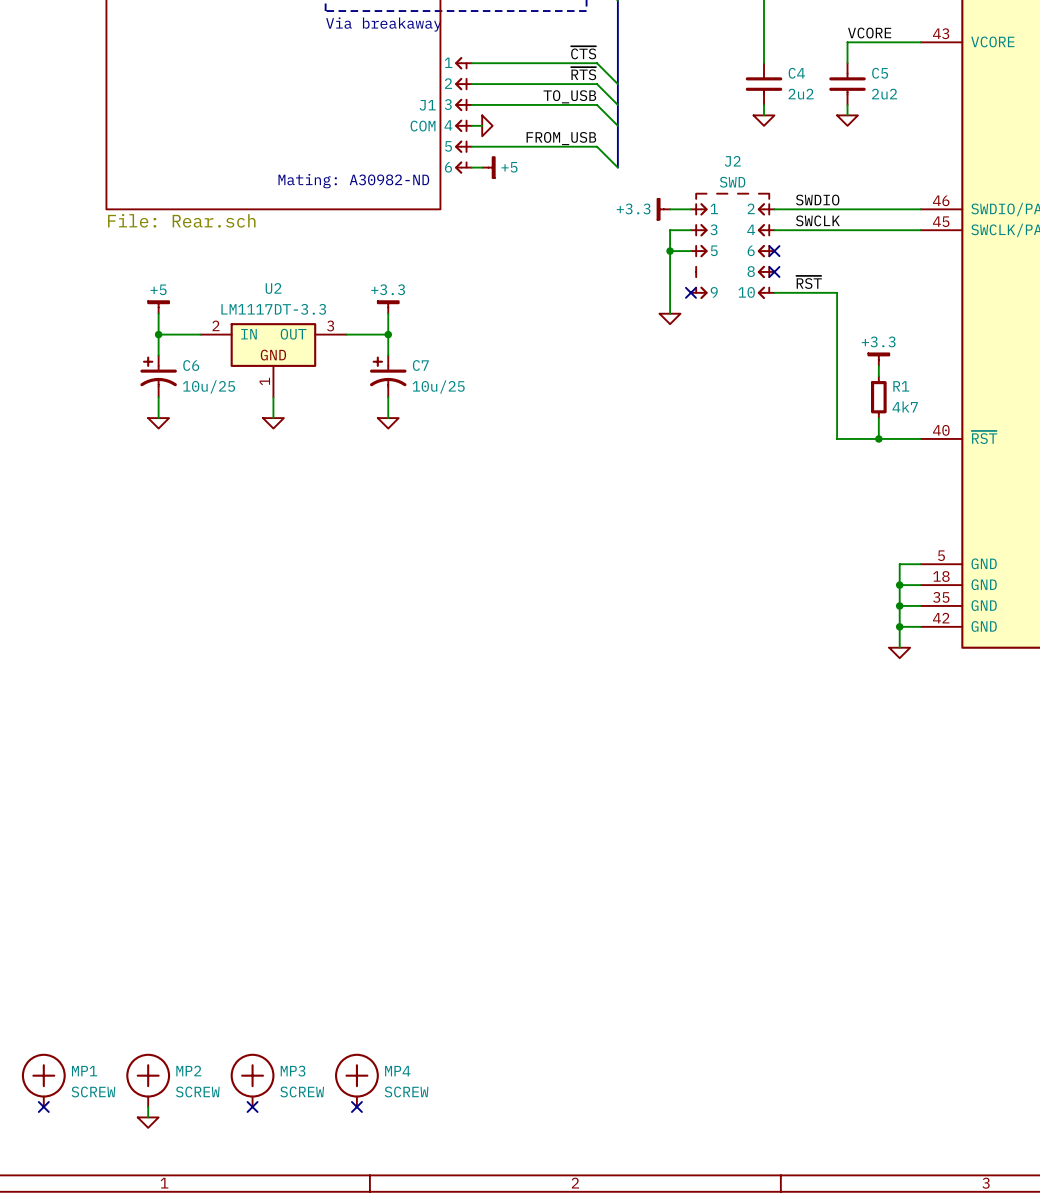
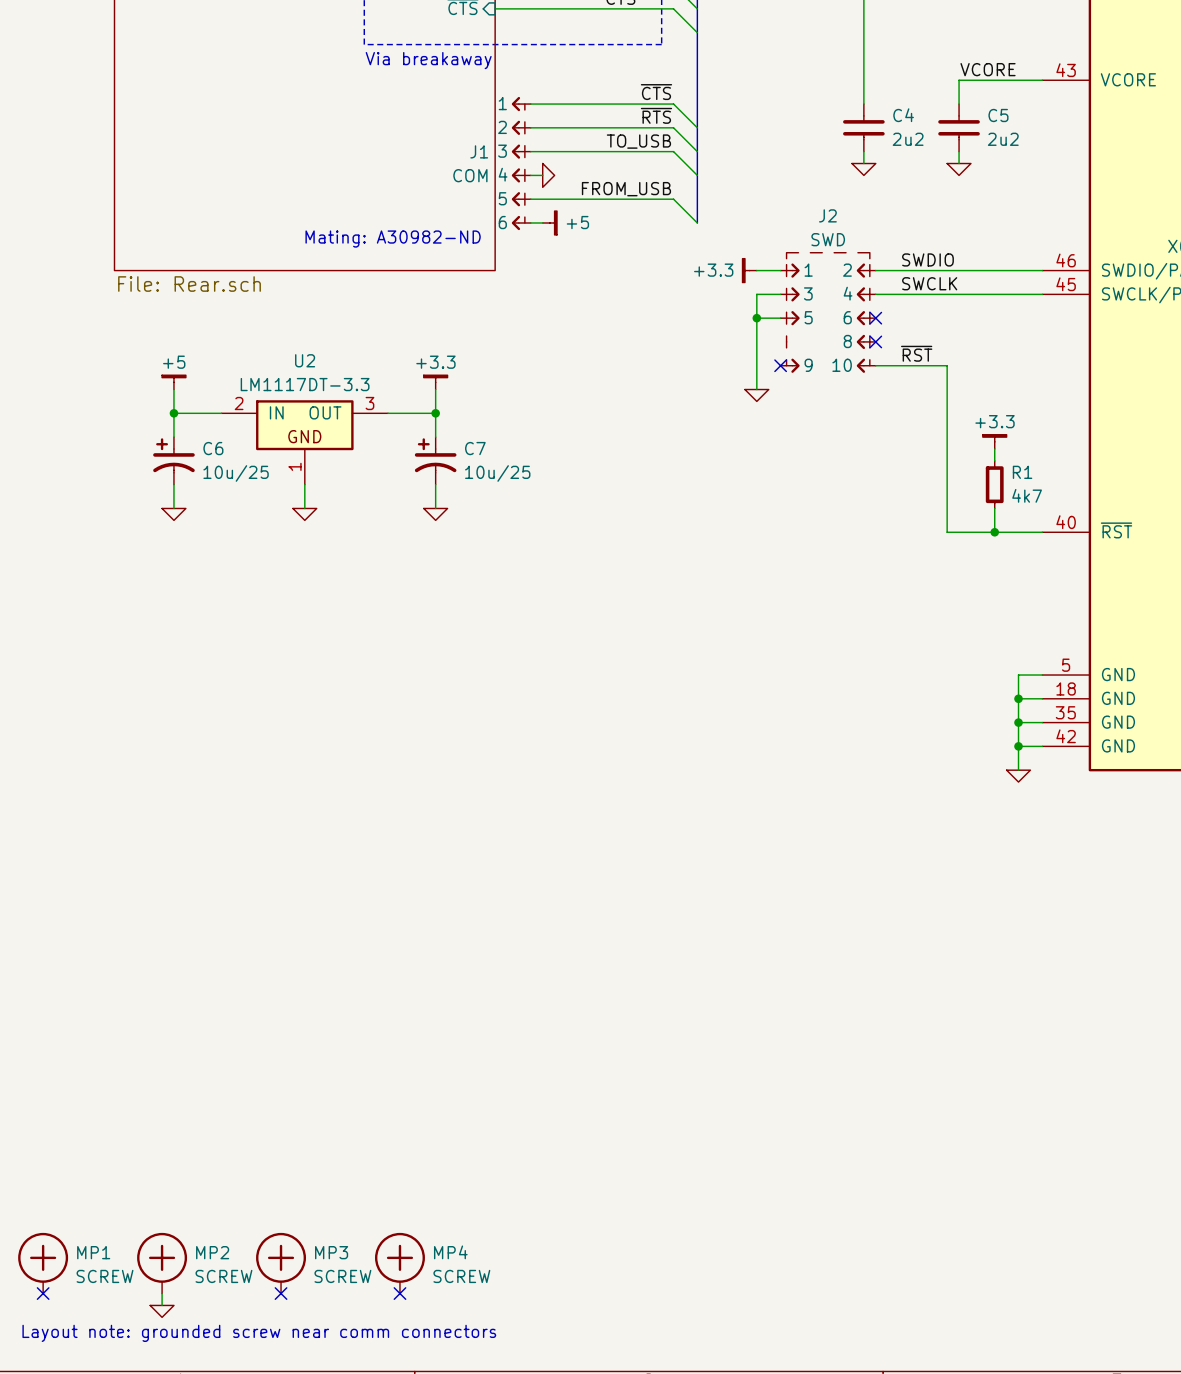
text: none -> Layout note: grounded screw near comm connectors (259, 1333)

